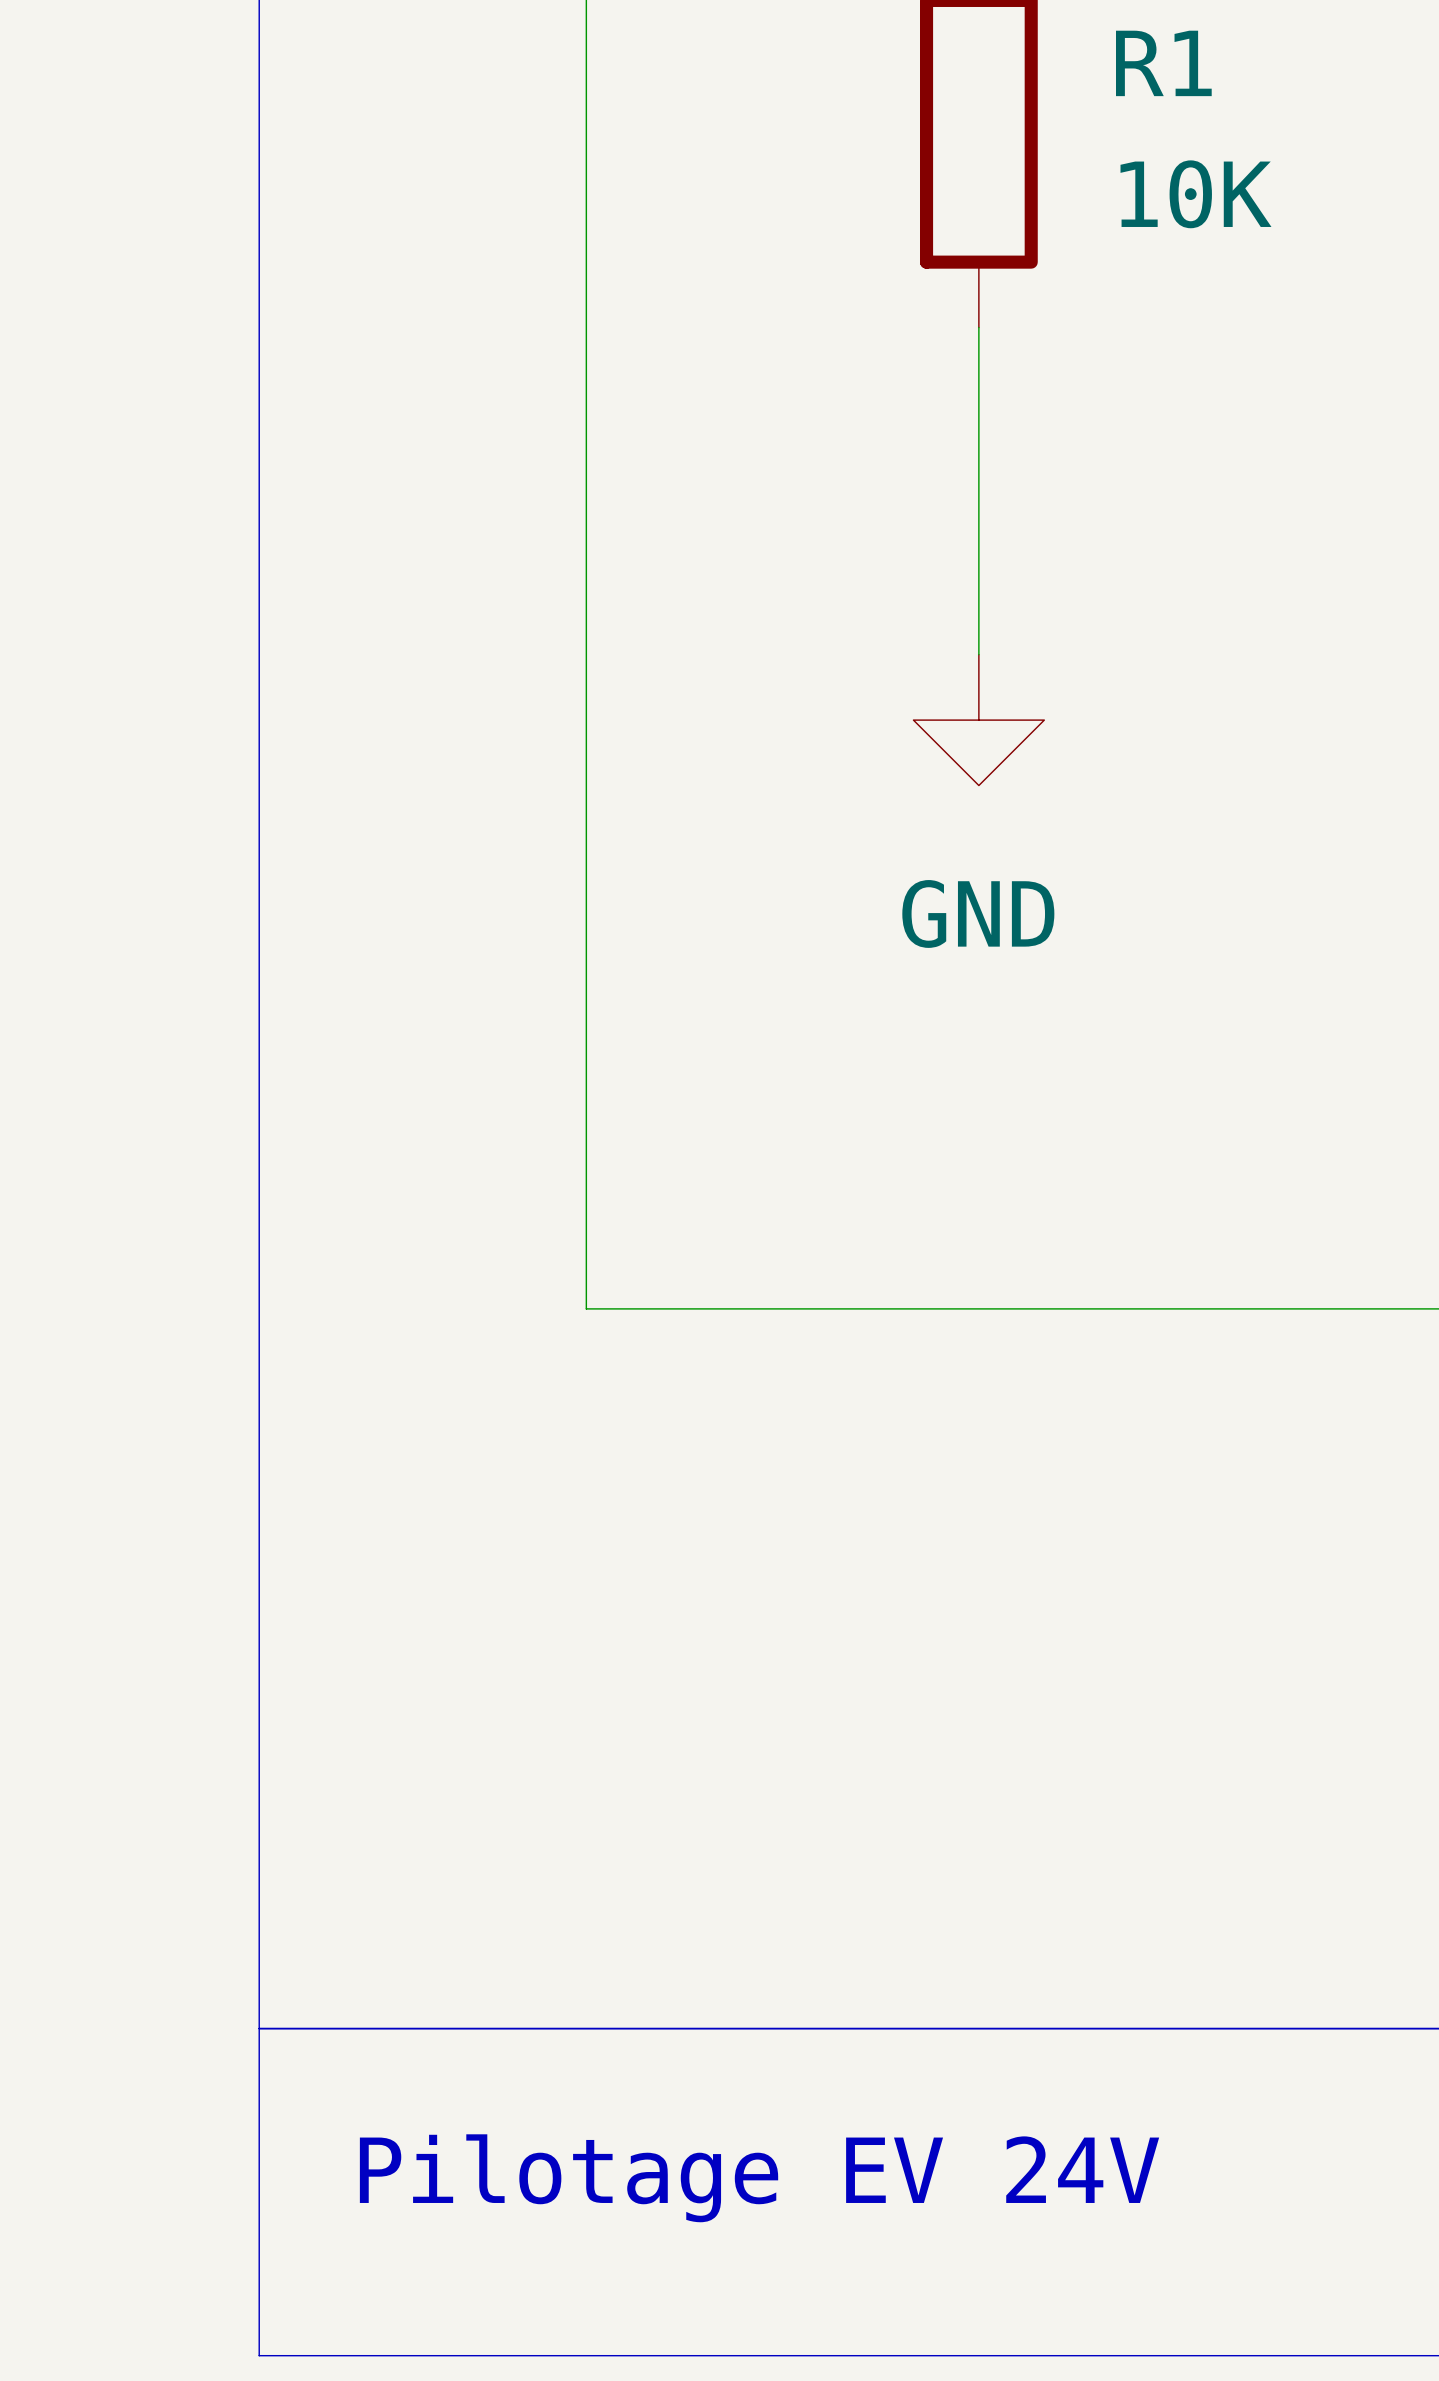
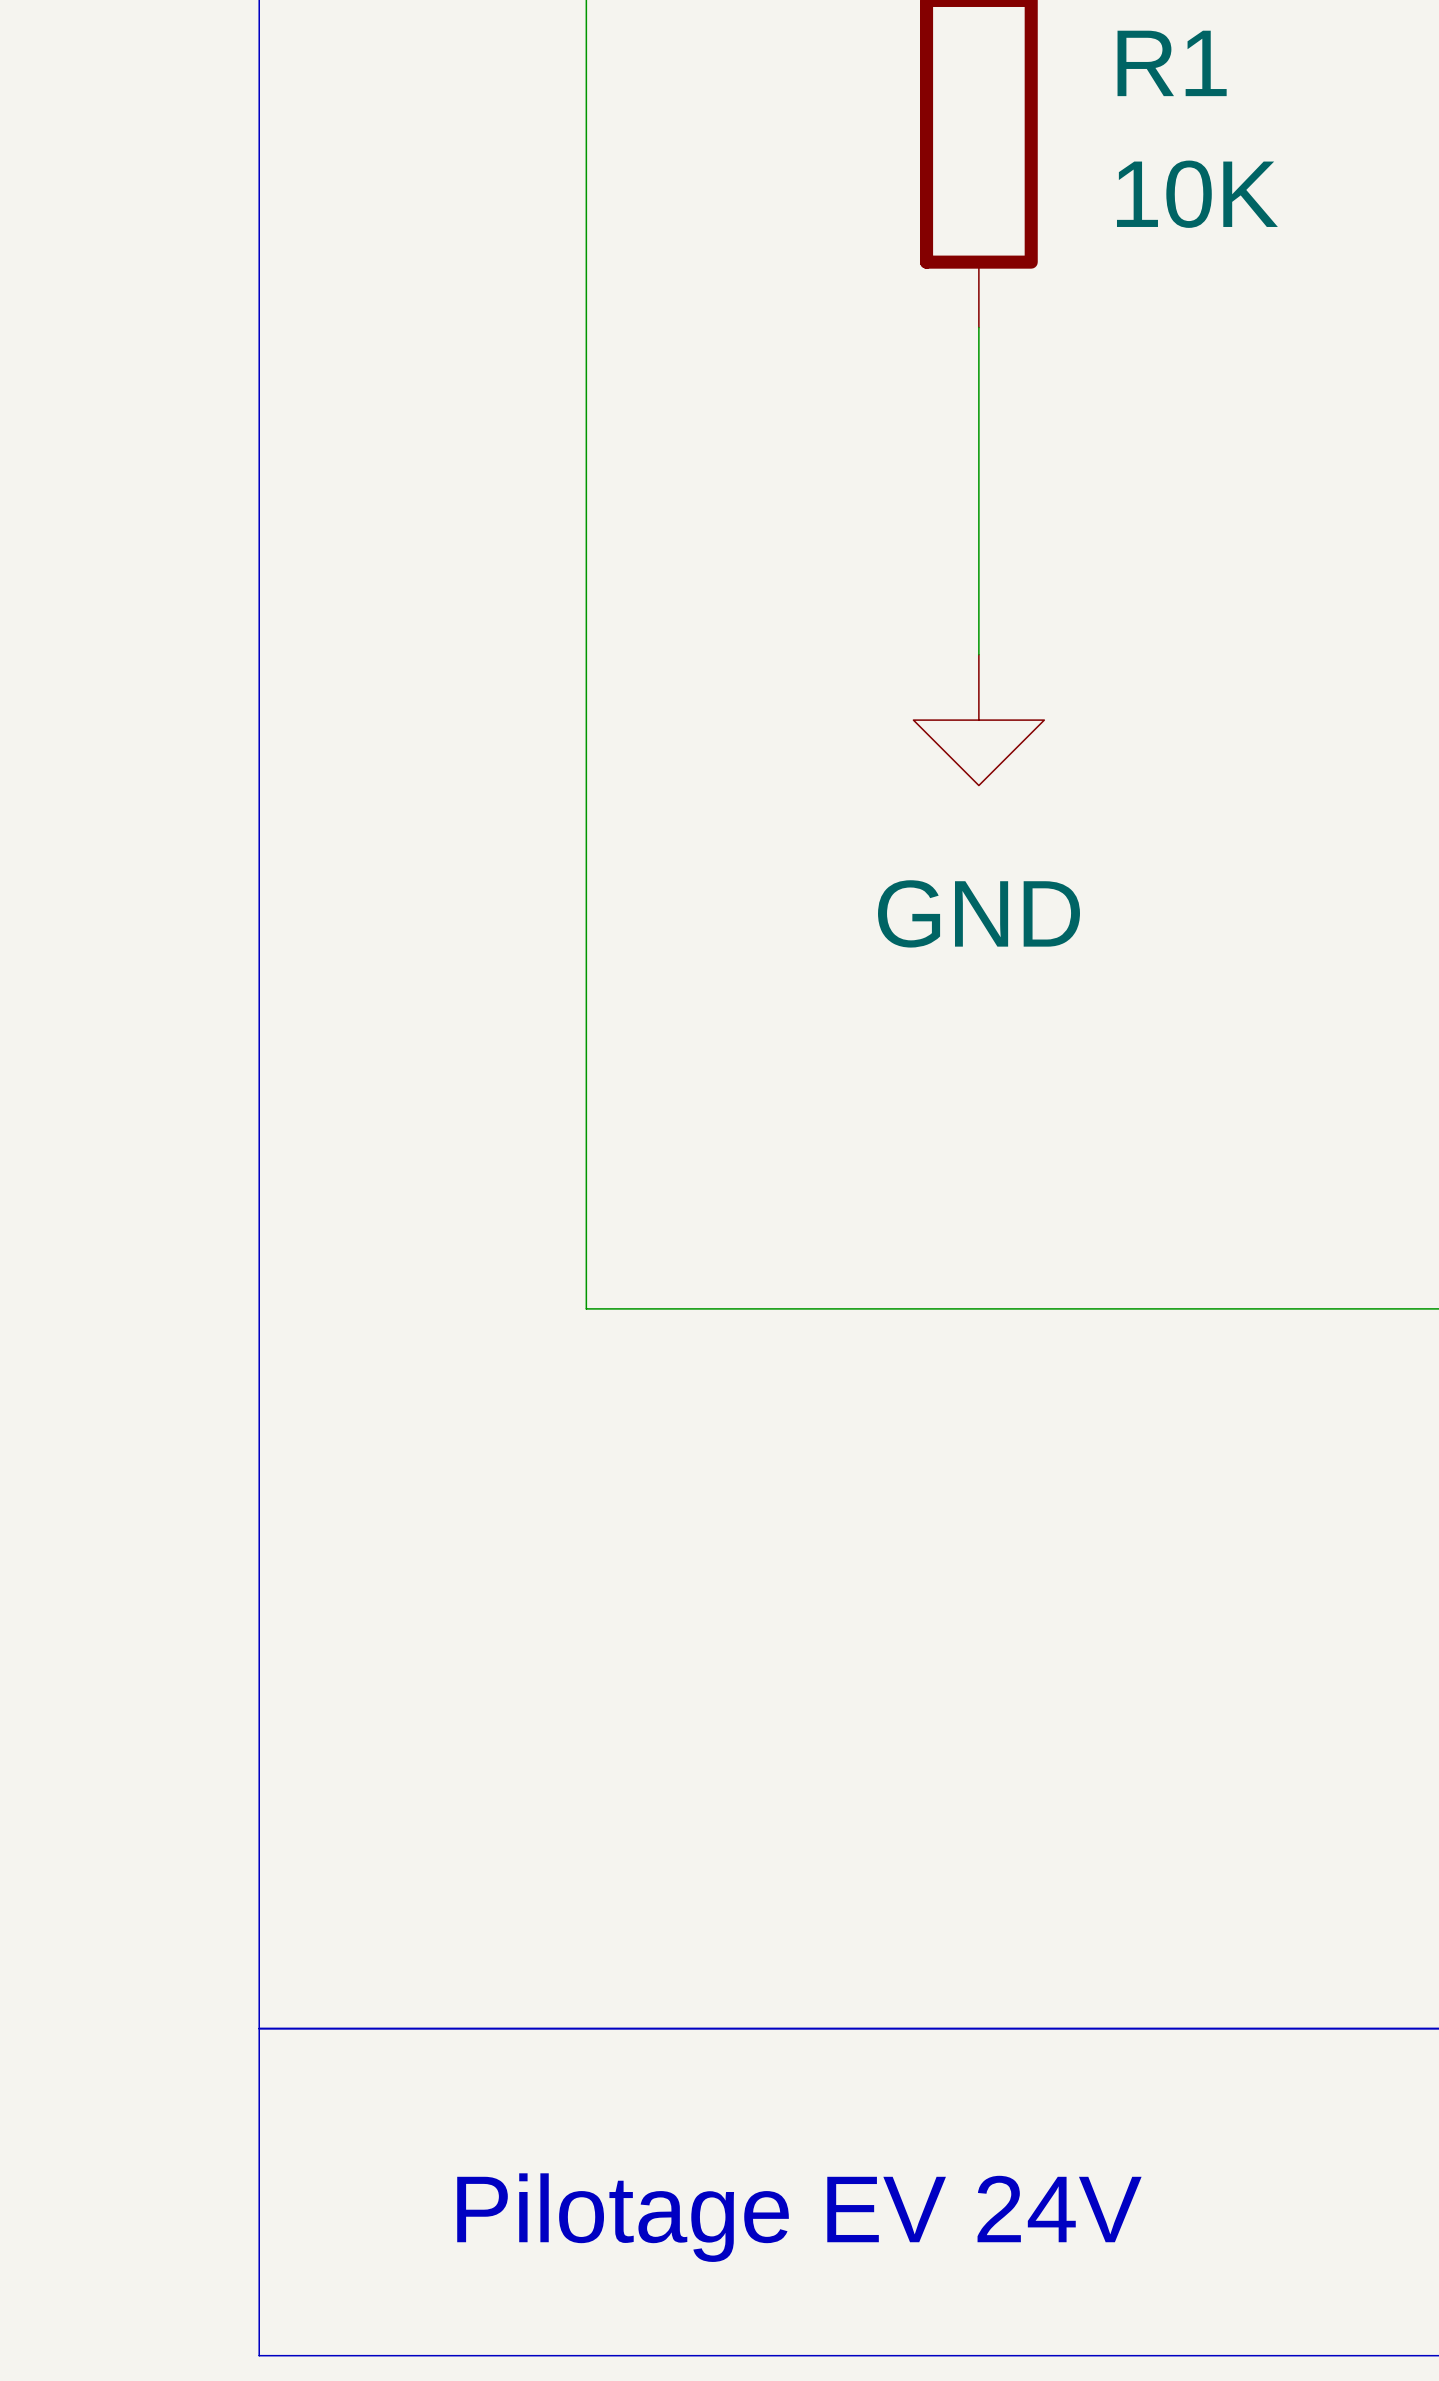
text position: Pilotage EV 24V (759, 2178) -> Pilotage EV 24V (799, 2217)

